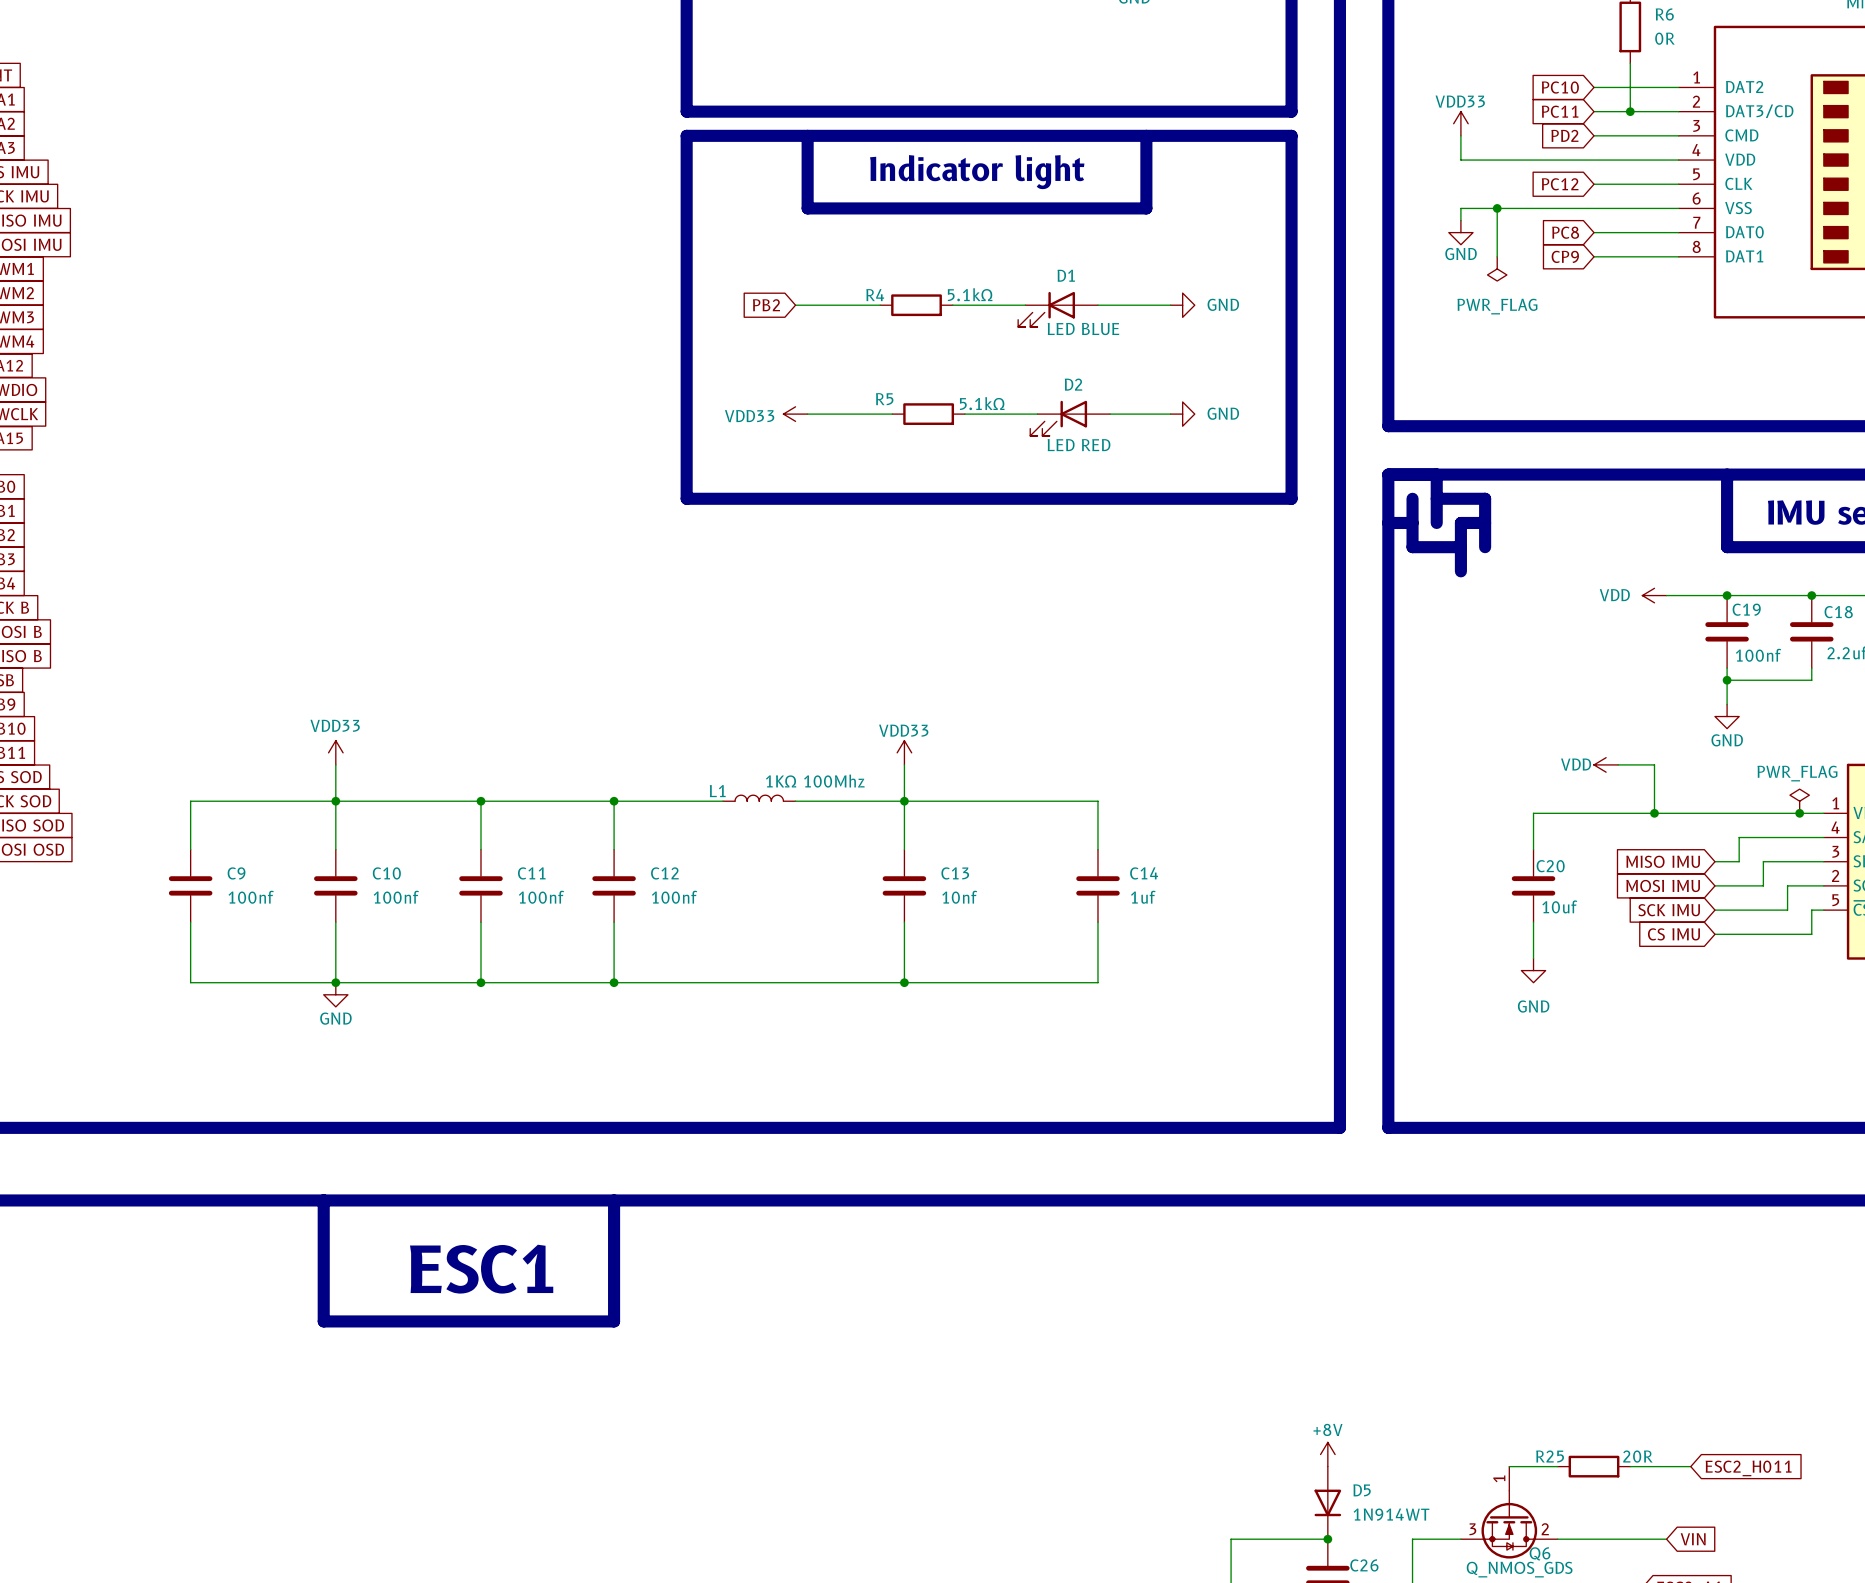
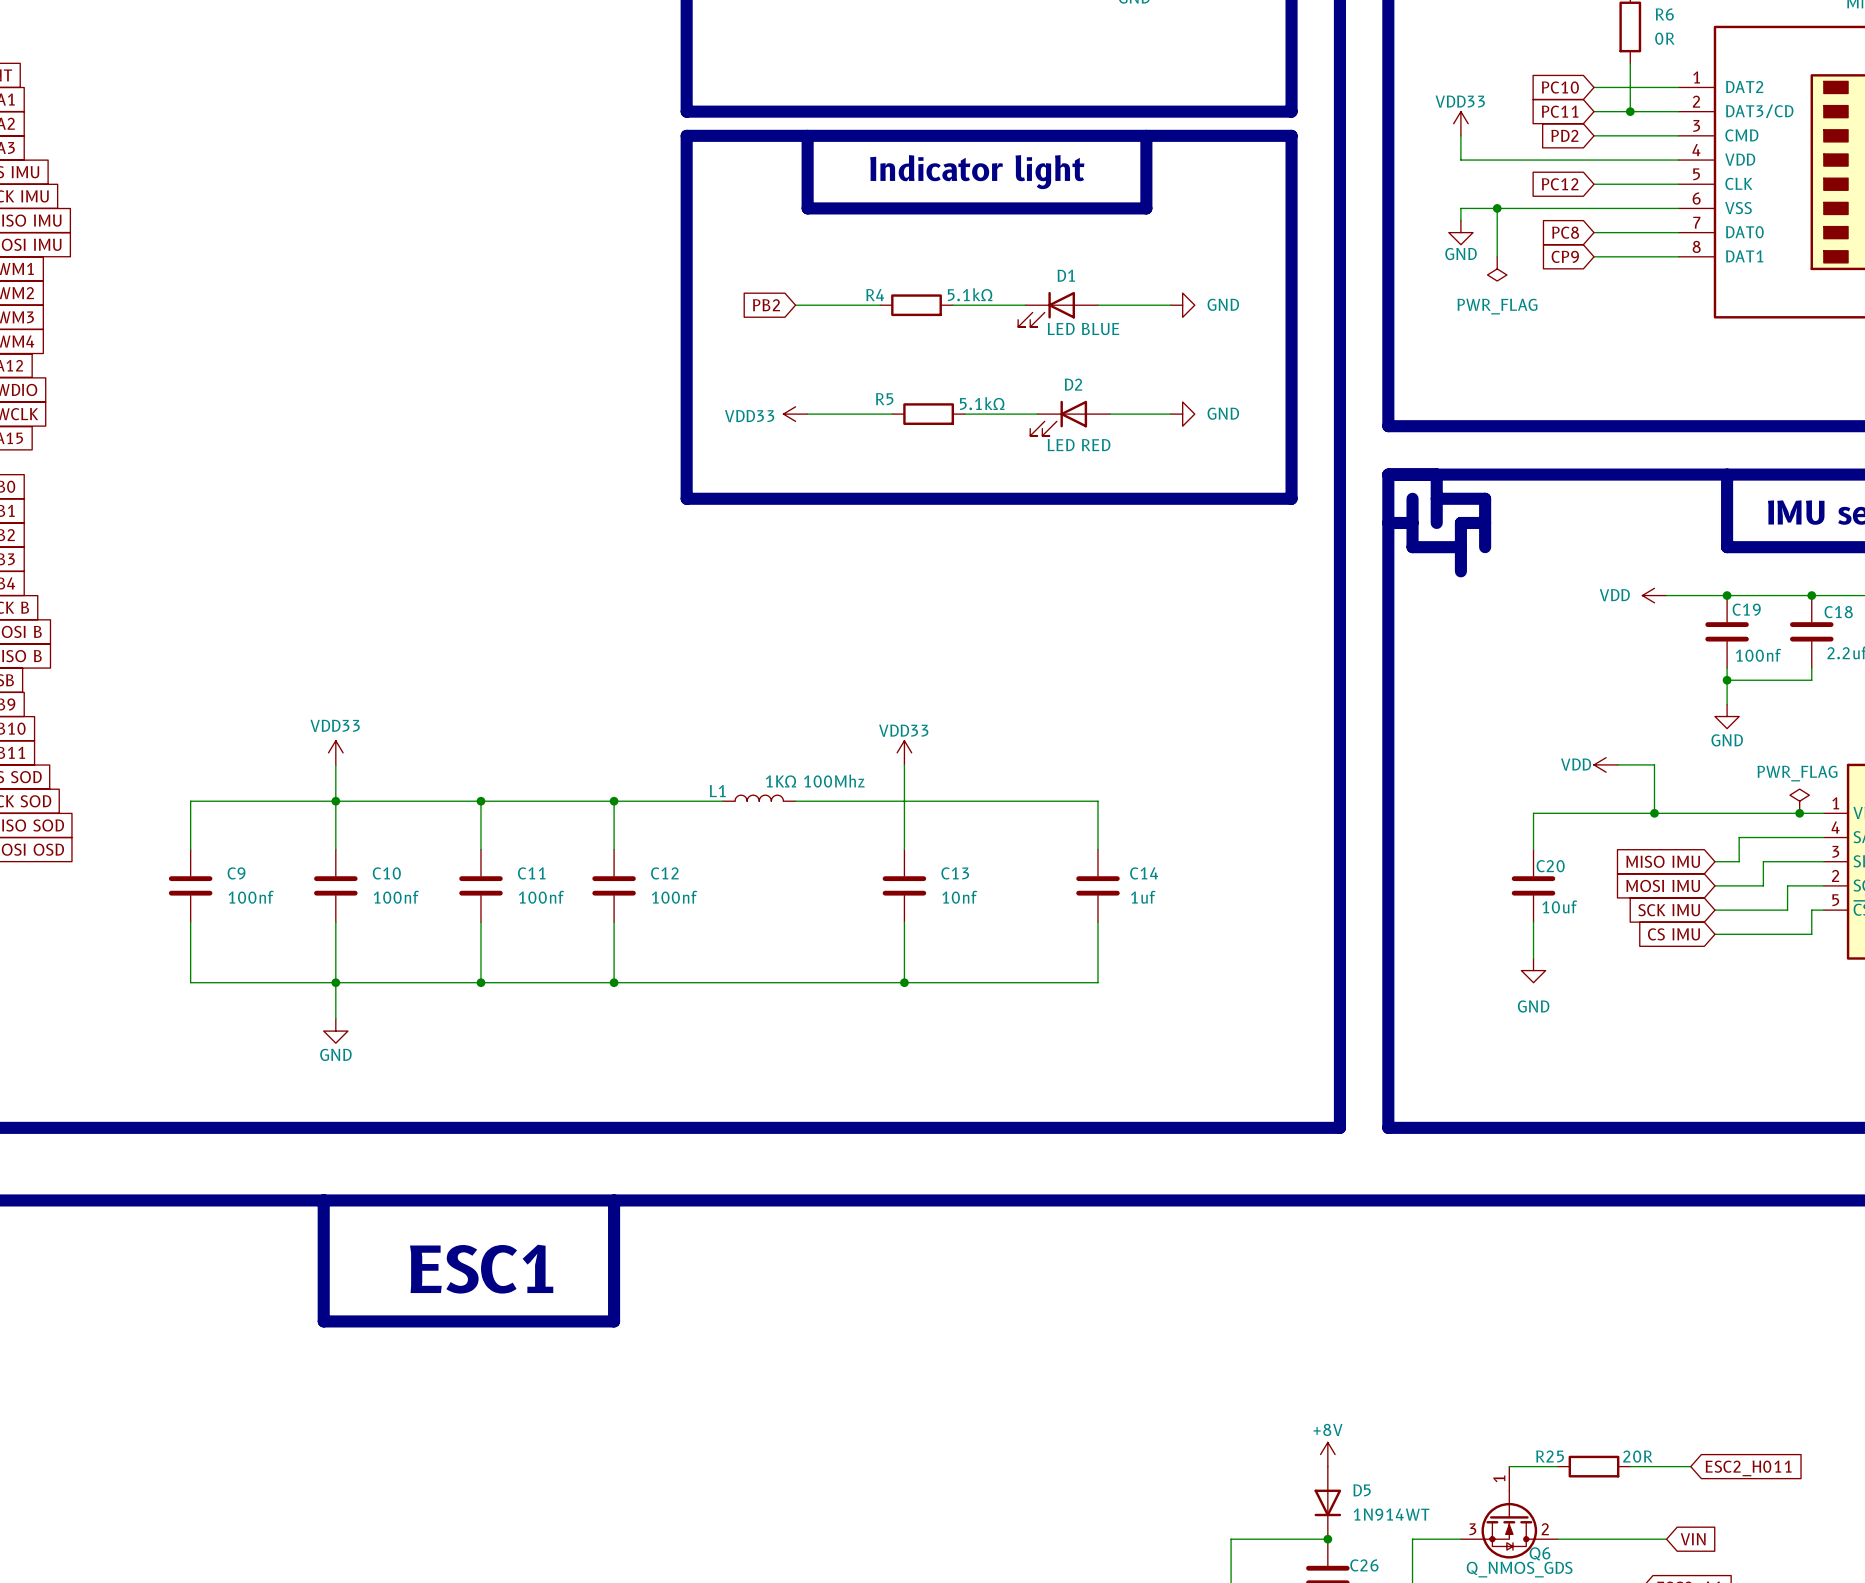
junction: (904, 801) -> none
wire: none -> (335, 982) (335, 1018)
power symbol position: GND (335, 994) -> GND (335, 1031)

